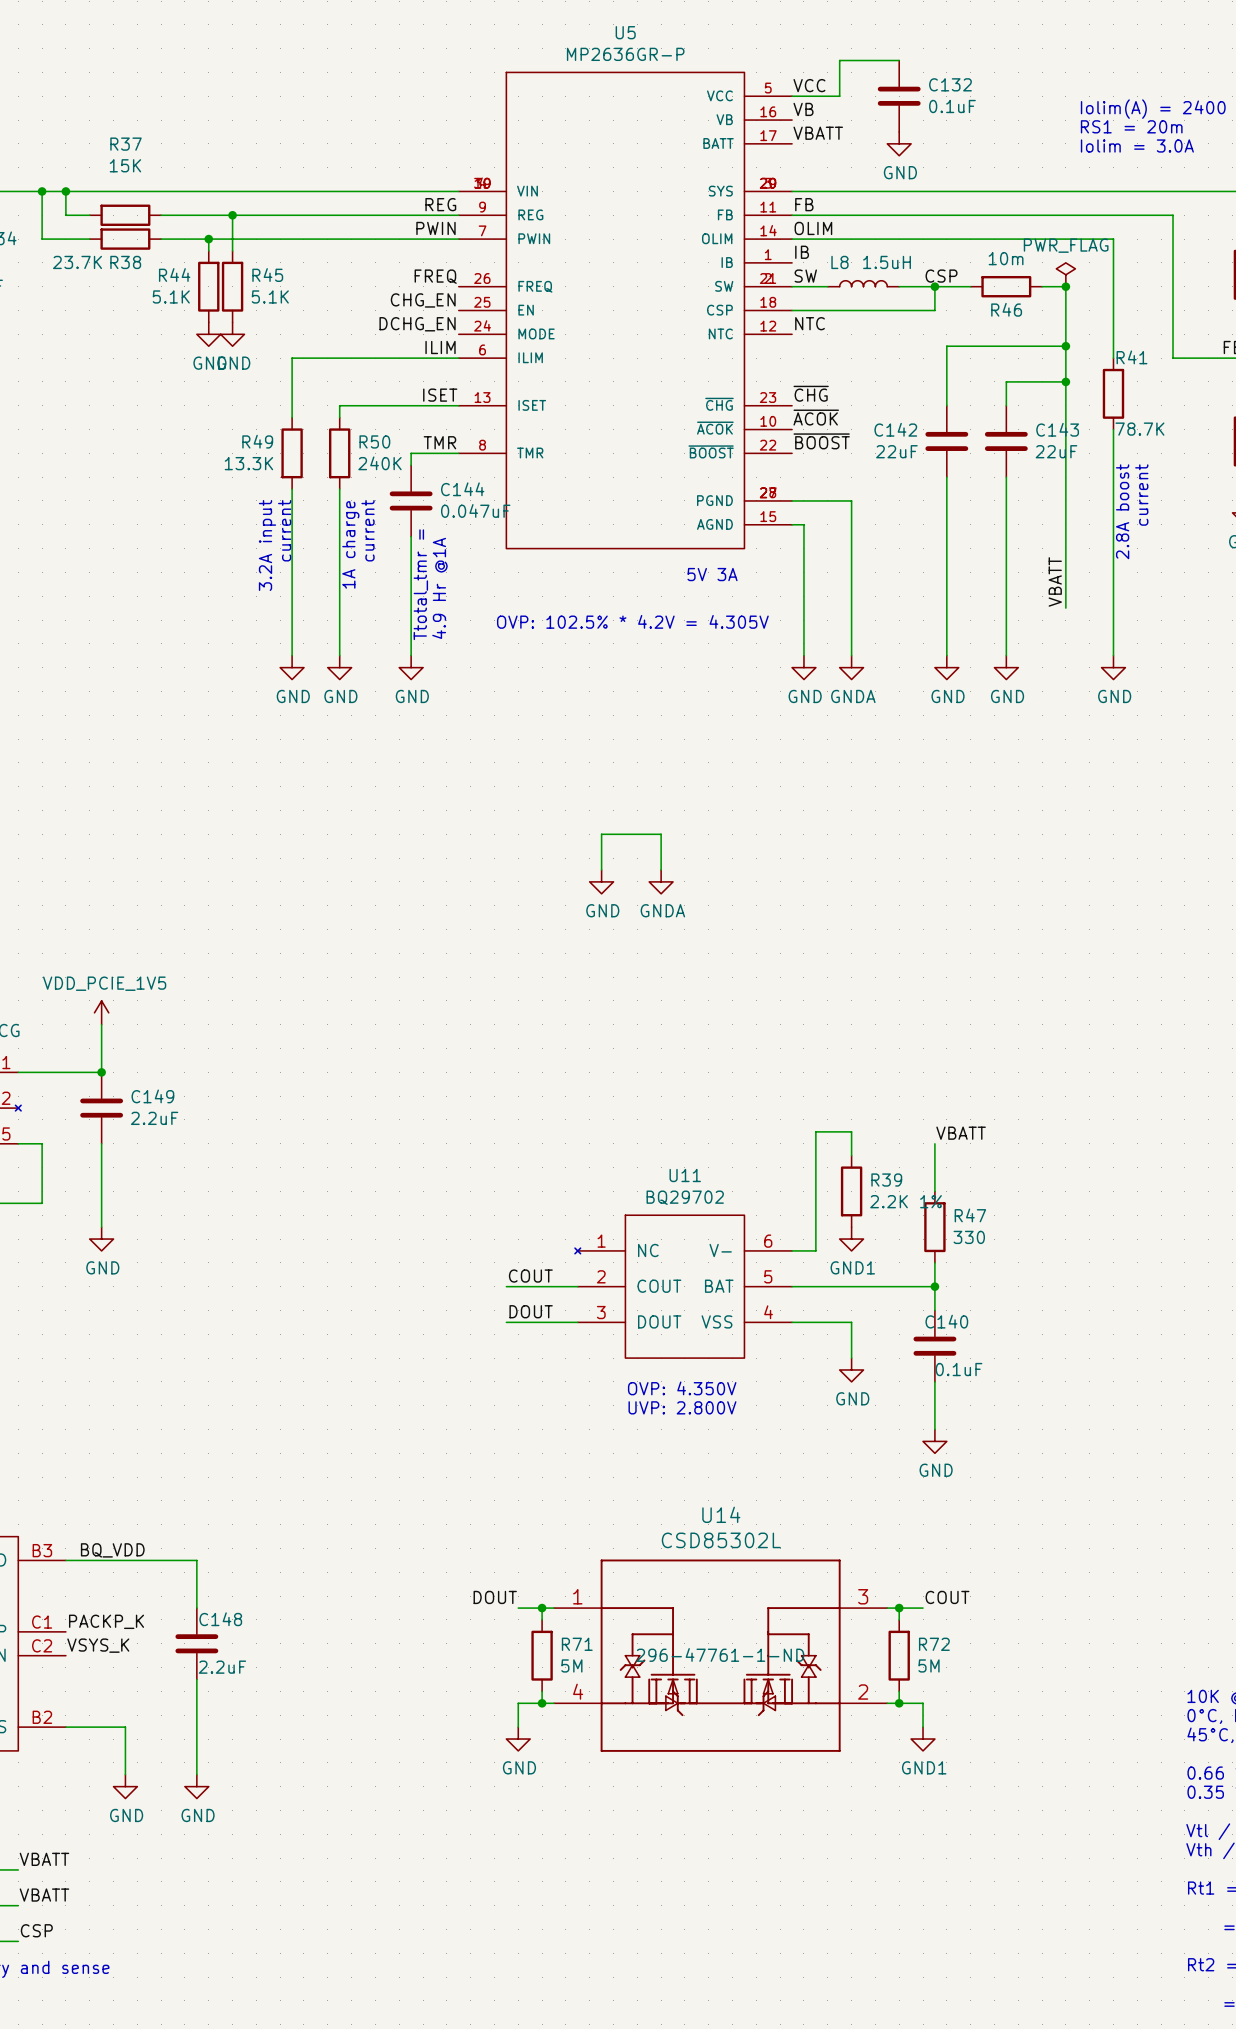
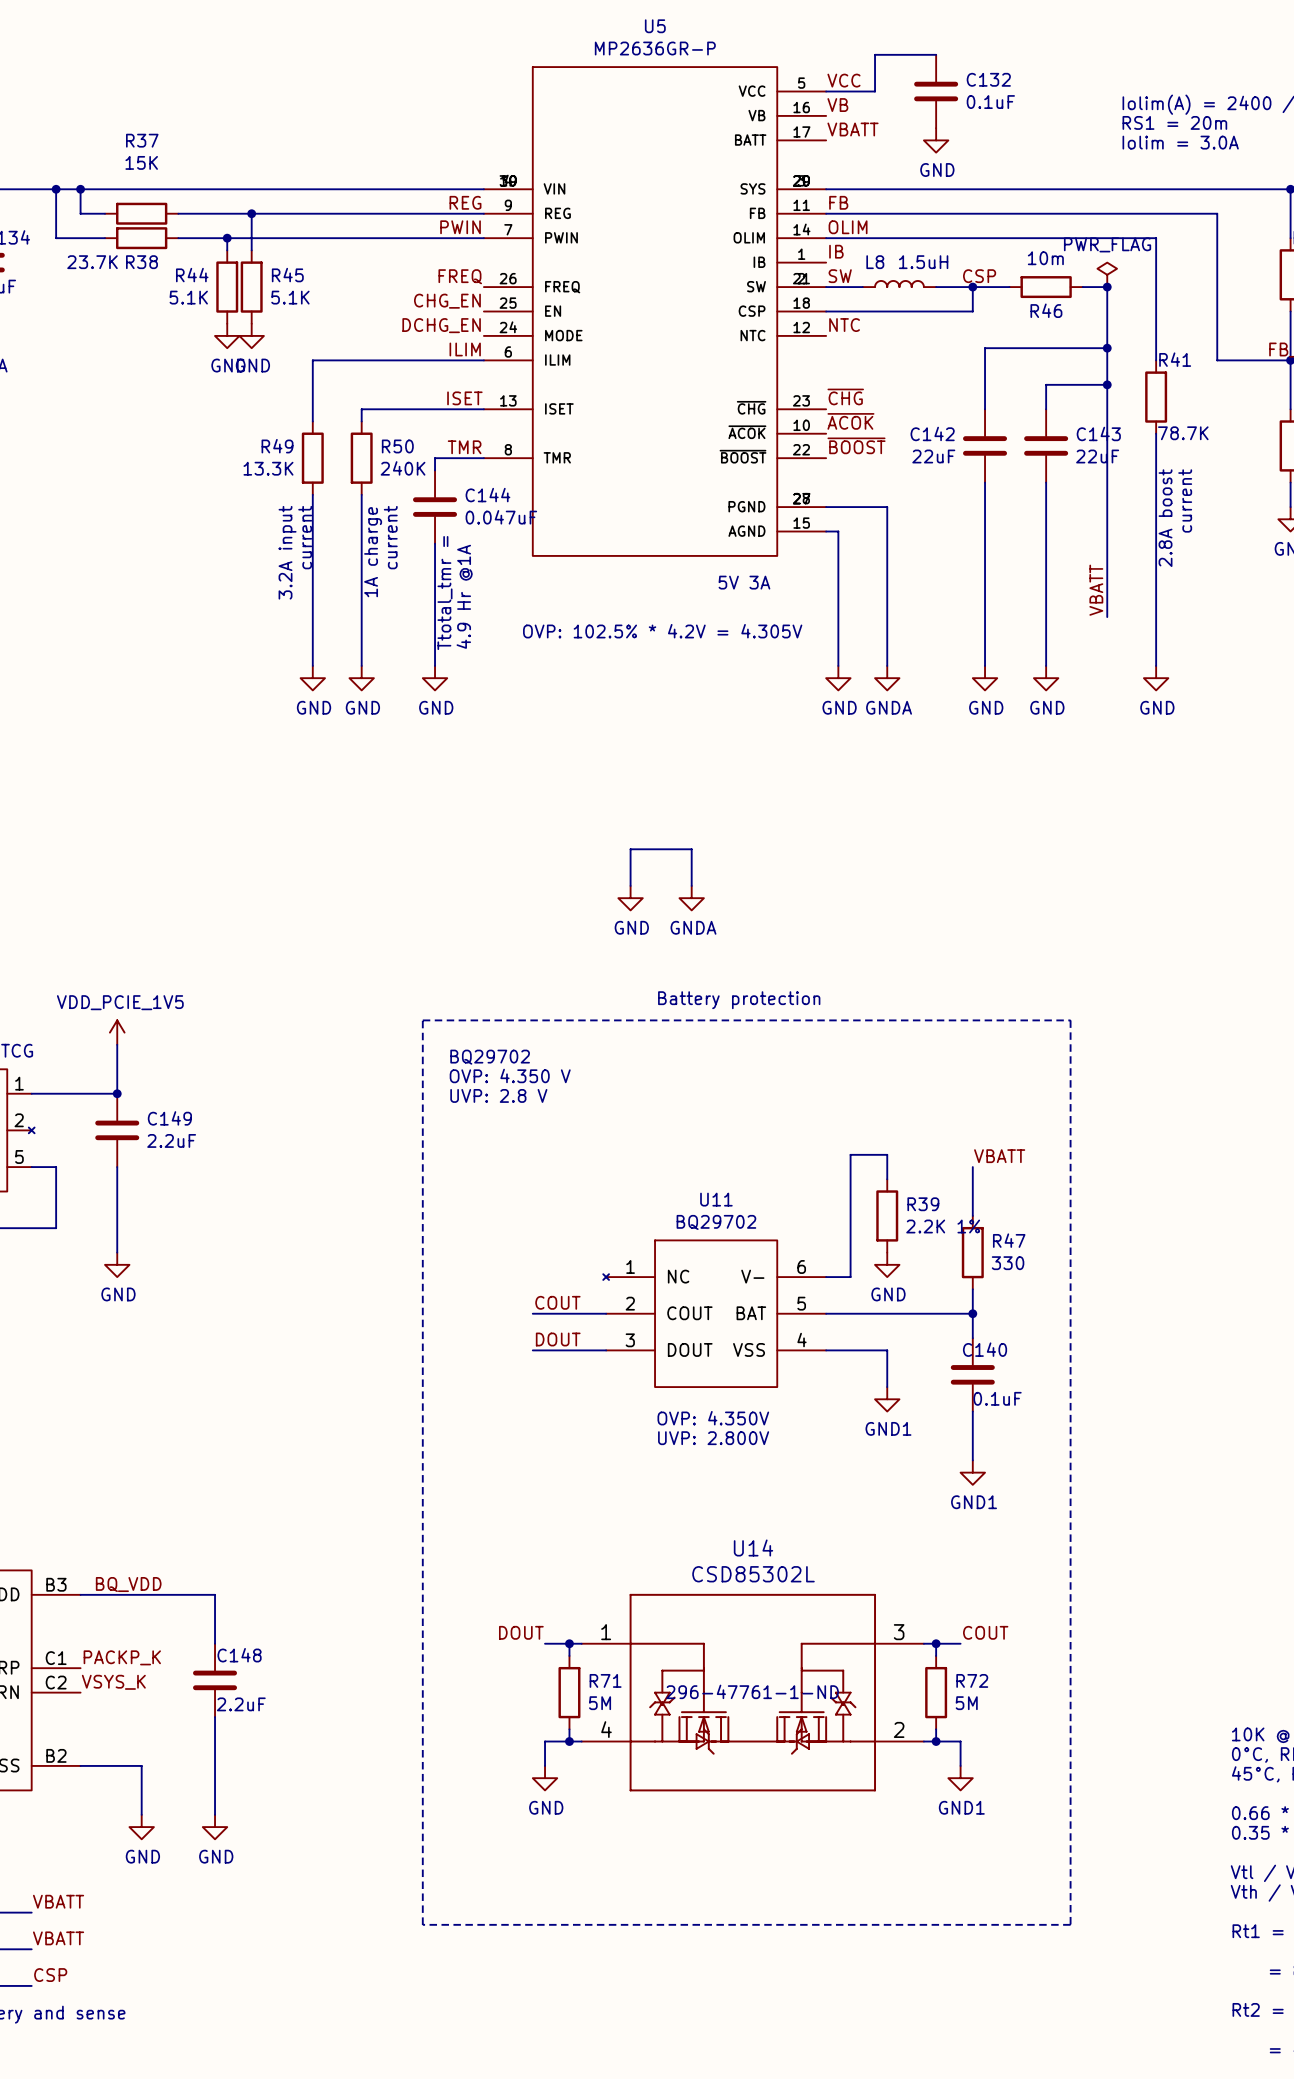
text: none -> Battery protection (739, 1000)
line: none -> (422, 1020) (1070, 1020) (1070, 1924) (422, 1924) (422, 1020)
text: none -> BQ29702 (490, 1057)
text: none -> OVP: 4.350 V (510, 1075)
text: none -> UVP: 2.8 V (498, 1095)
power symbol: GND1 (851, 1239) -> GND (887, 1264)
power symbol: GND (851, 1369) -> GND1 (887, 1399)
power symbol: GND (934, 1441) -> GND1 (972, 1472)

